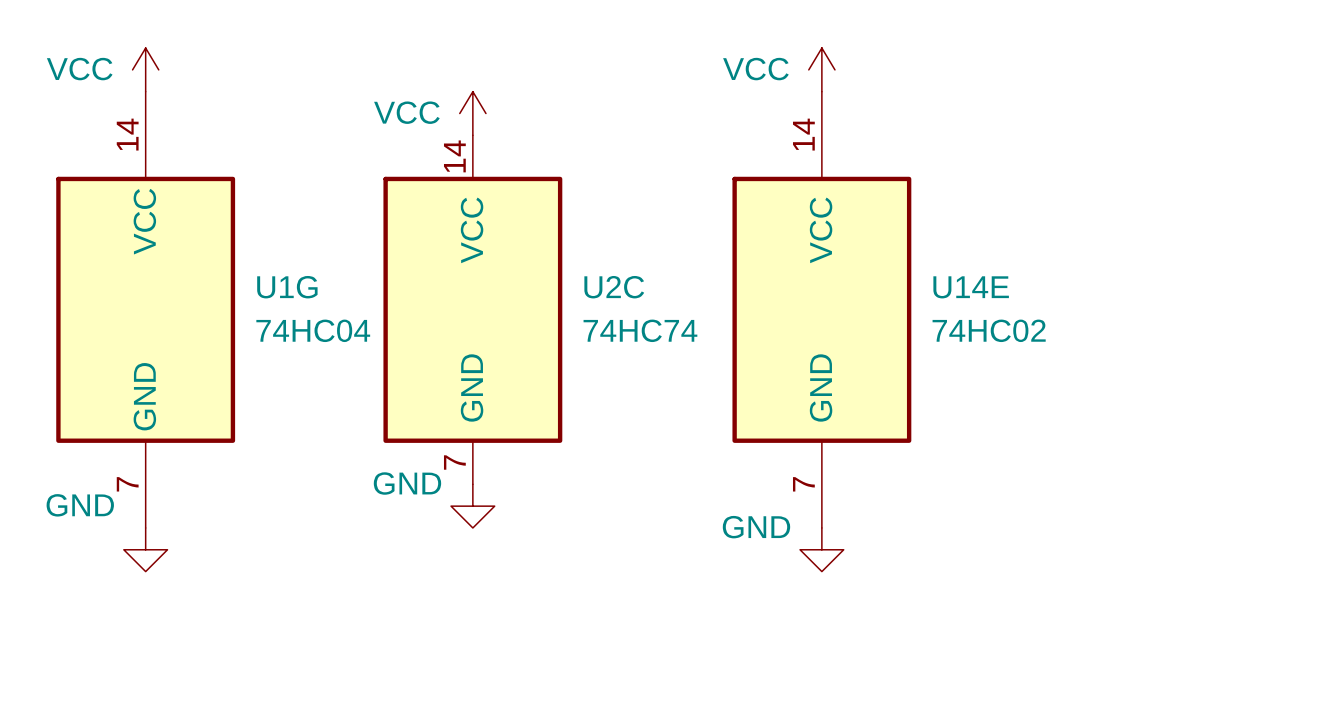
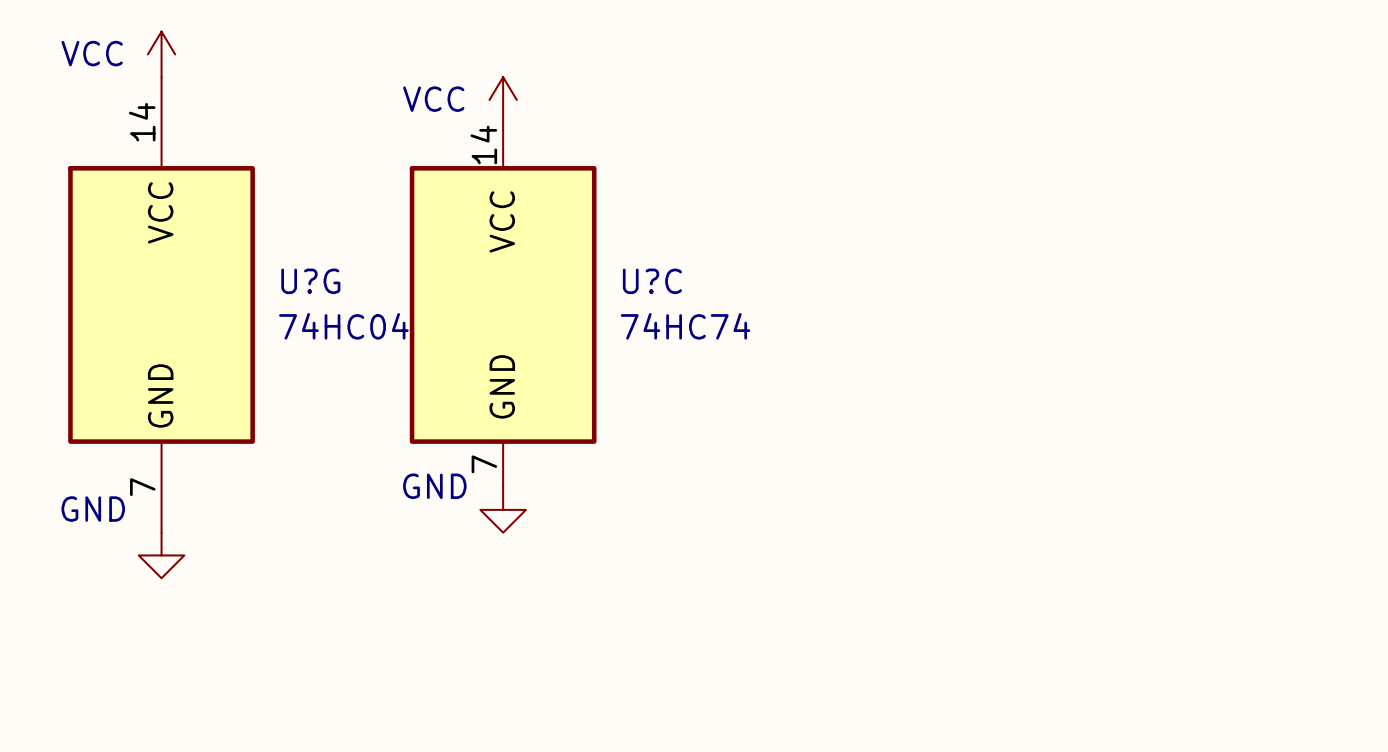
power symbol: VCC (821, 69) -> none
U1G name: U1G (287, 287) -> U?G (310, 281)
U2C name: U2C (614, 287) -> U?C (652, 281)
U14E: 74HC02 (821, 309) -> none
power symbol: GND (821, 549) -> none

